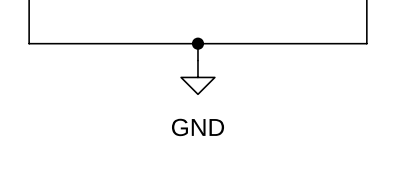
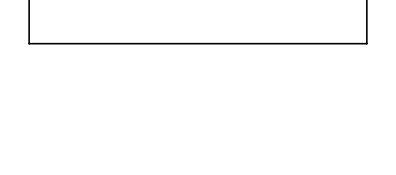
wire: (197, 43) (197, 60) -> none
junction: (197, 43) -> none
power symbol: GND (197, 77) -> none

